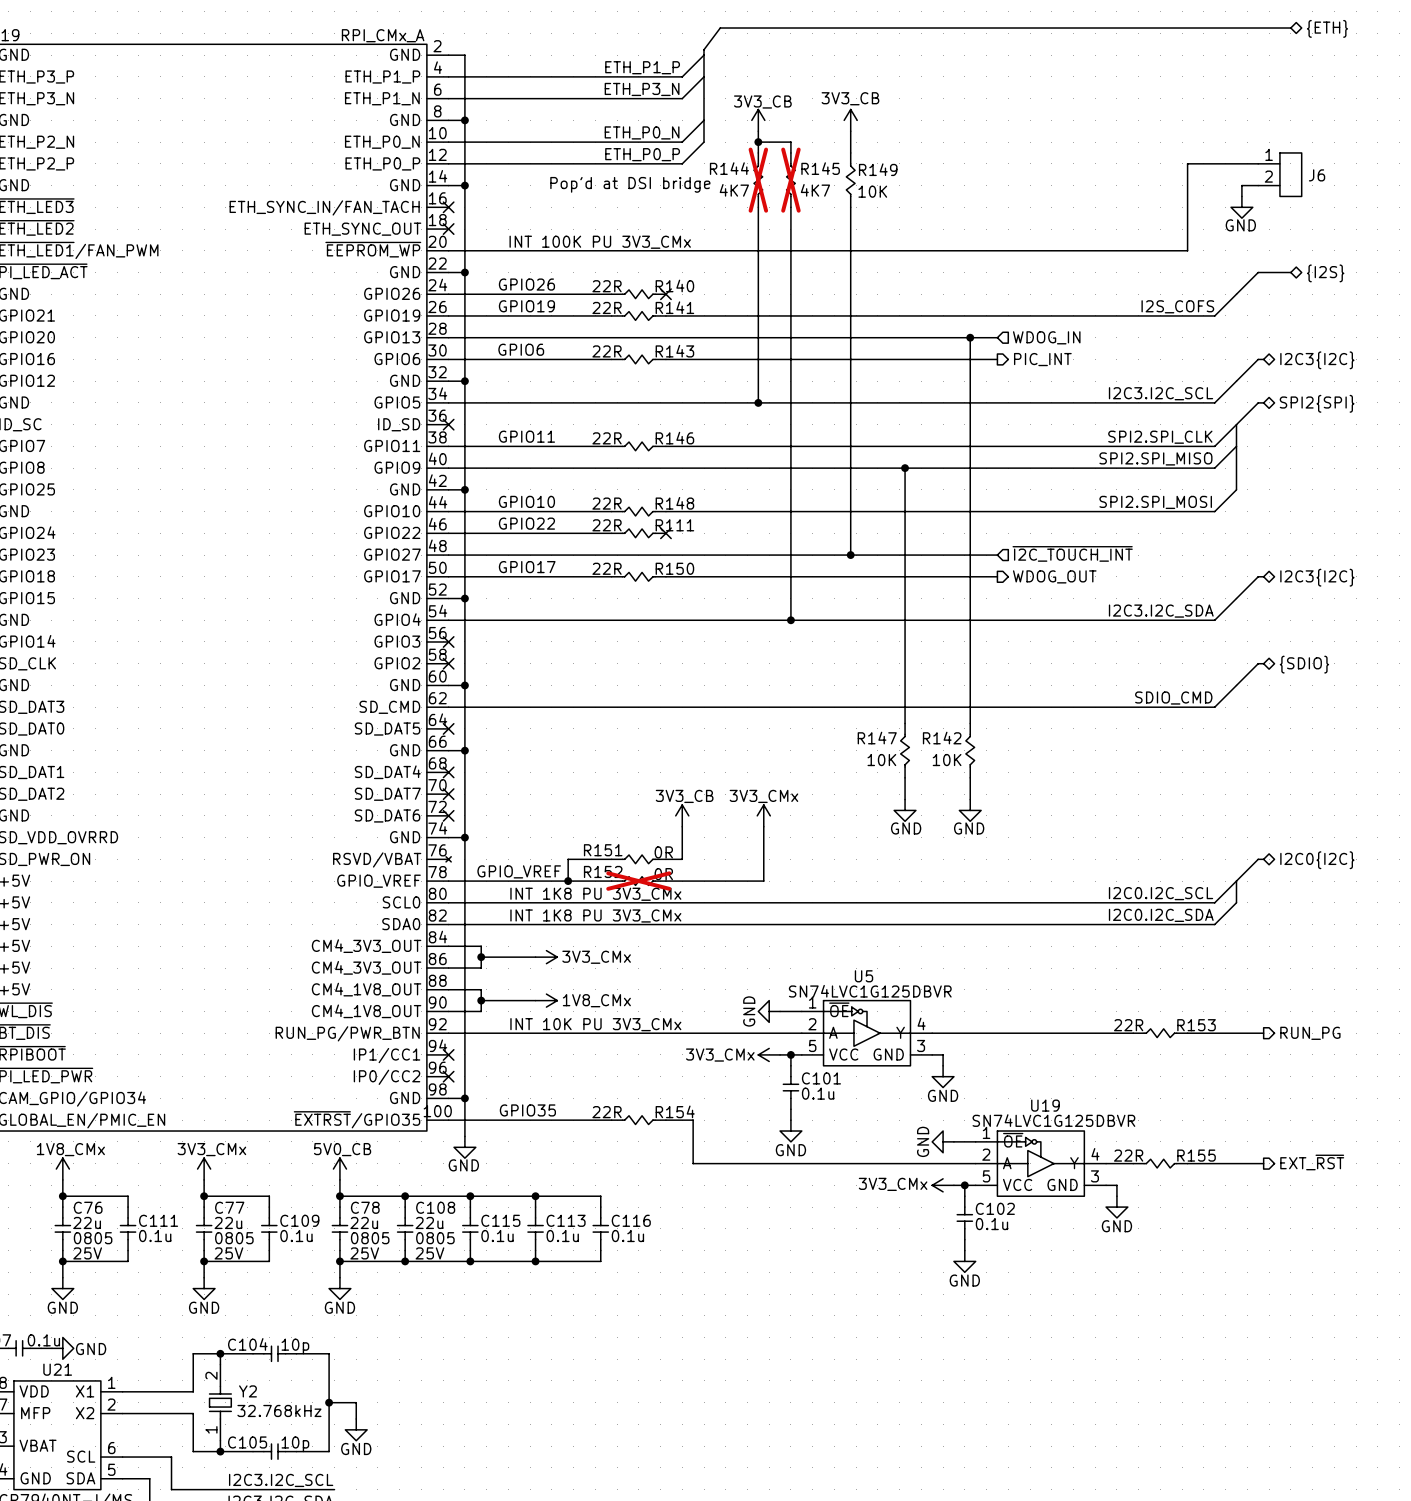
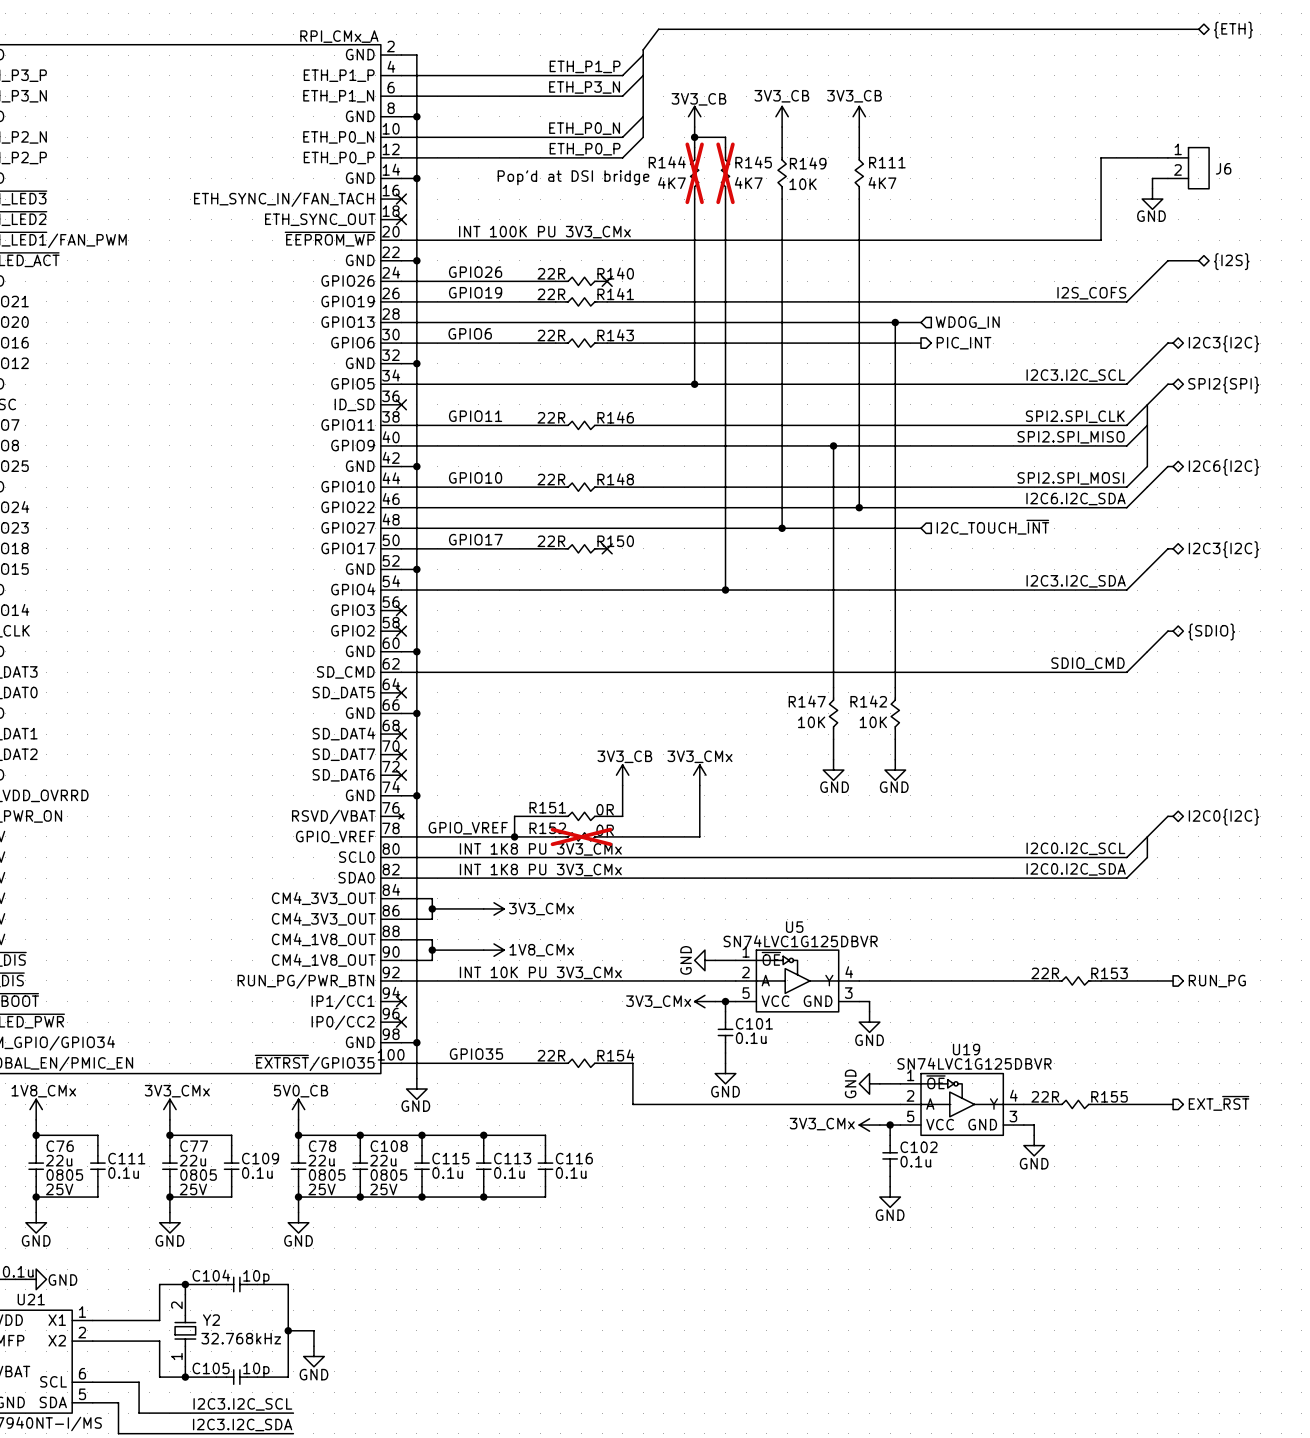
power symbol: none -> 3V3_CB (859, 116)
wire: none -> (859, 127) (859, 147)
wire: none -> (859, 199) (859, 507)
bus: none -> (1173, 466) (1167, 466) (1147, 487)
hierarchical label: none -> I2C6{I2C} (1223, 467)
wire: none -> (1147, 487) (1126, 507) (555, 507)
label: GPIO22 (526, 523) -> none
label: none -> I2C6.I2C_SDA (1075, 499)
R111 value: 22R (607, 525) -> 4K7 (882, 182)
R111 rotation: 0° (638, 533) -> 90° clockwise (859, 173)
R111 position: (638, 533) -> (859, 173)
no-connect mark position: (665, 533) -> (607, 548)
junction: none -> (859, 507)
hierarchical label: ~{I2C_TOUCH_INT} (1072, 553) -> I2C_TOUCH_~{INT} (992, 527)
wire: (665, 576) (997, 576) -> none
hierarchical label: WDOG_OUT (1054, 576) -> none

